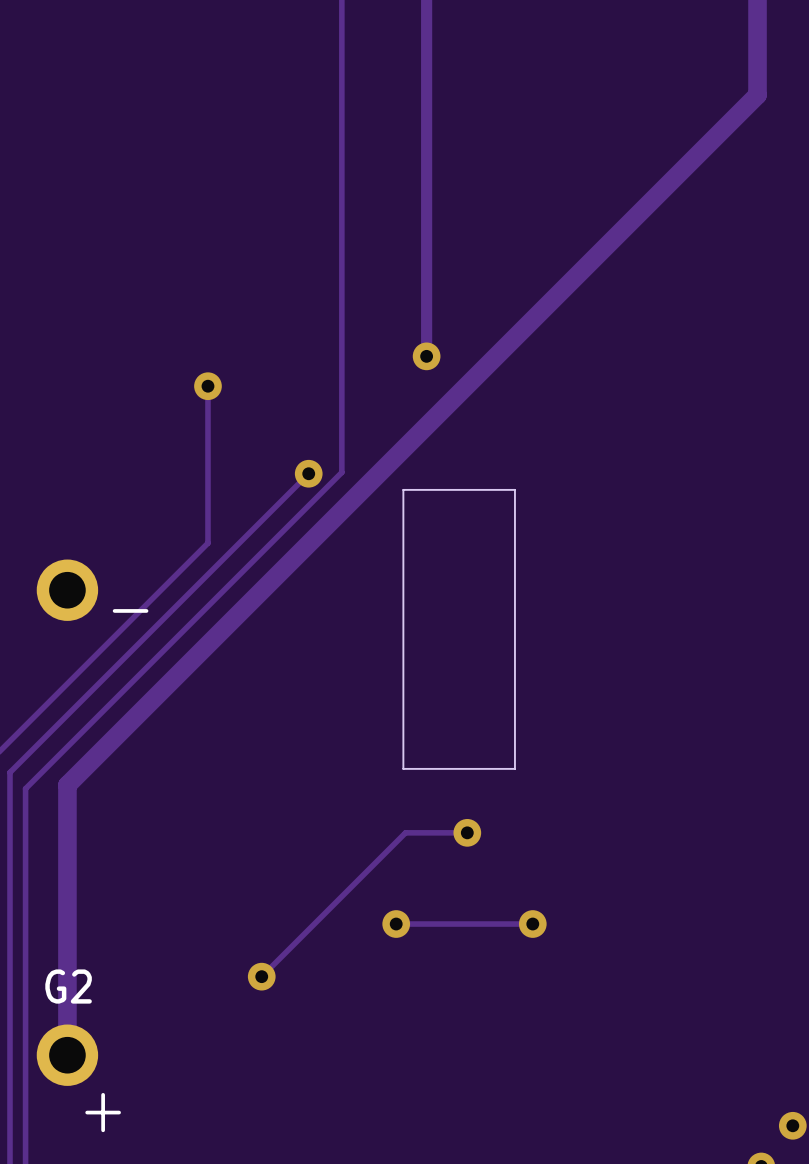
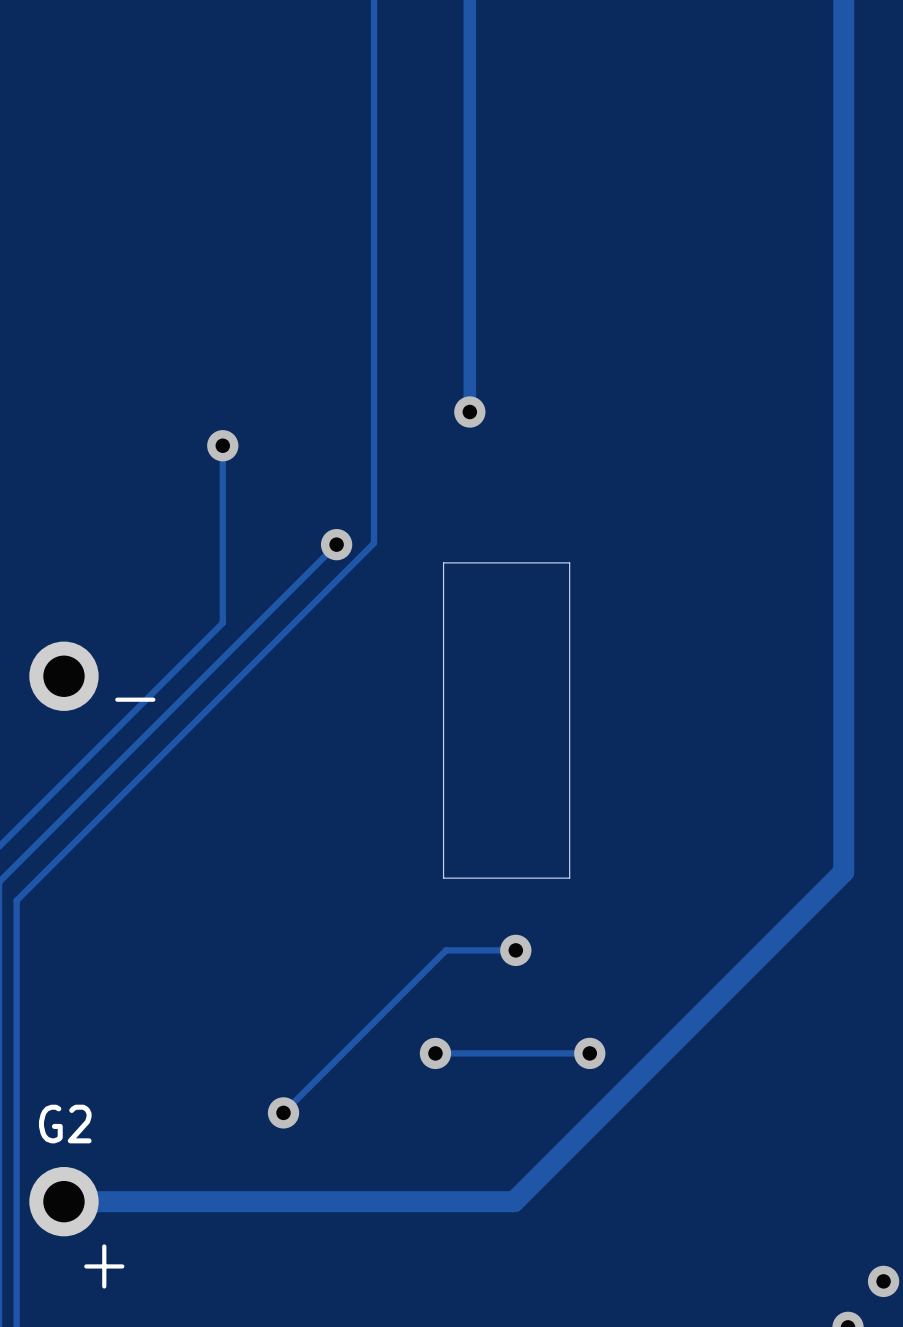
track: (757, 95) (67, 785) (67, 1055) -> (843, 116) (843, 872) (514, 1201) (63, 1201)

